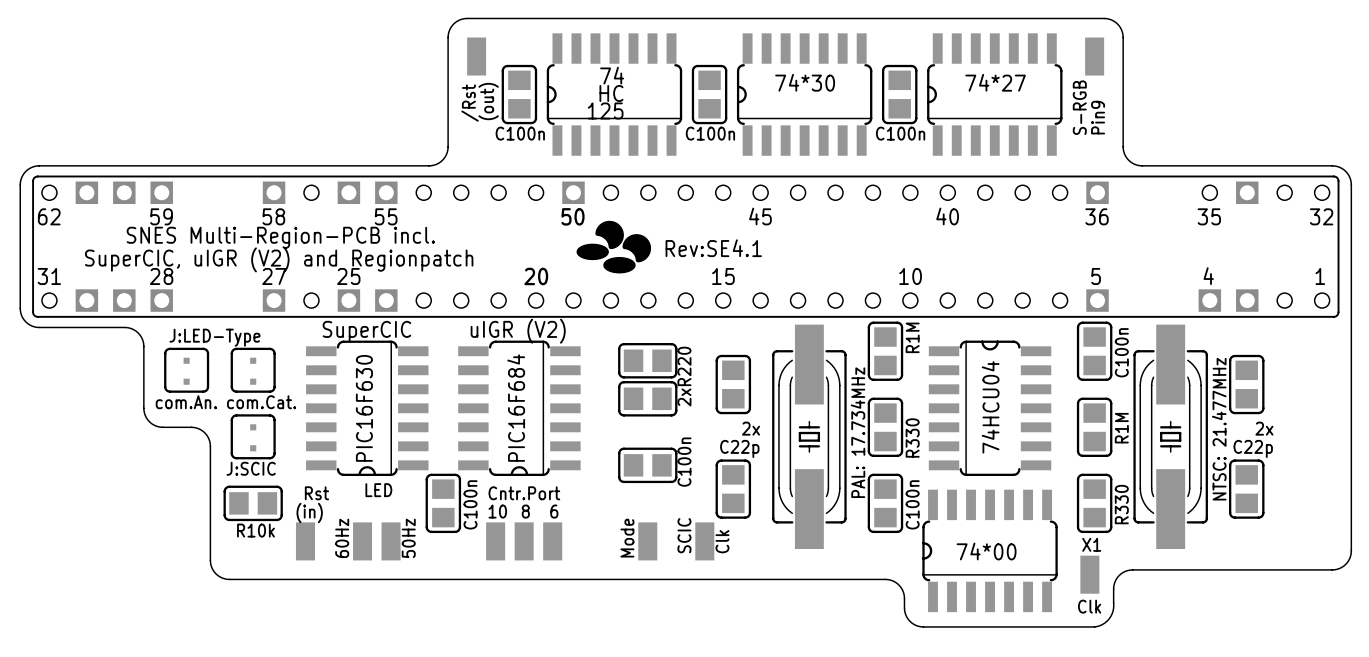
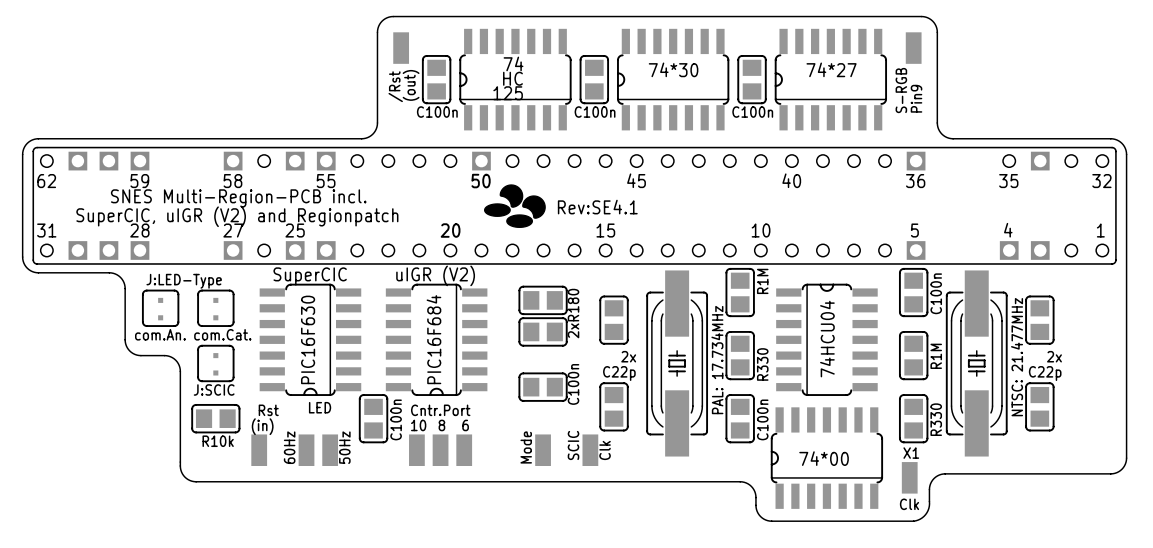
text: 2xR220 (684, 376) -> 2xR180 (573, 313)

